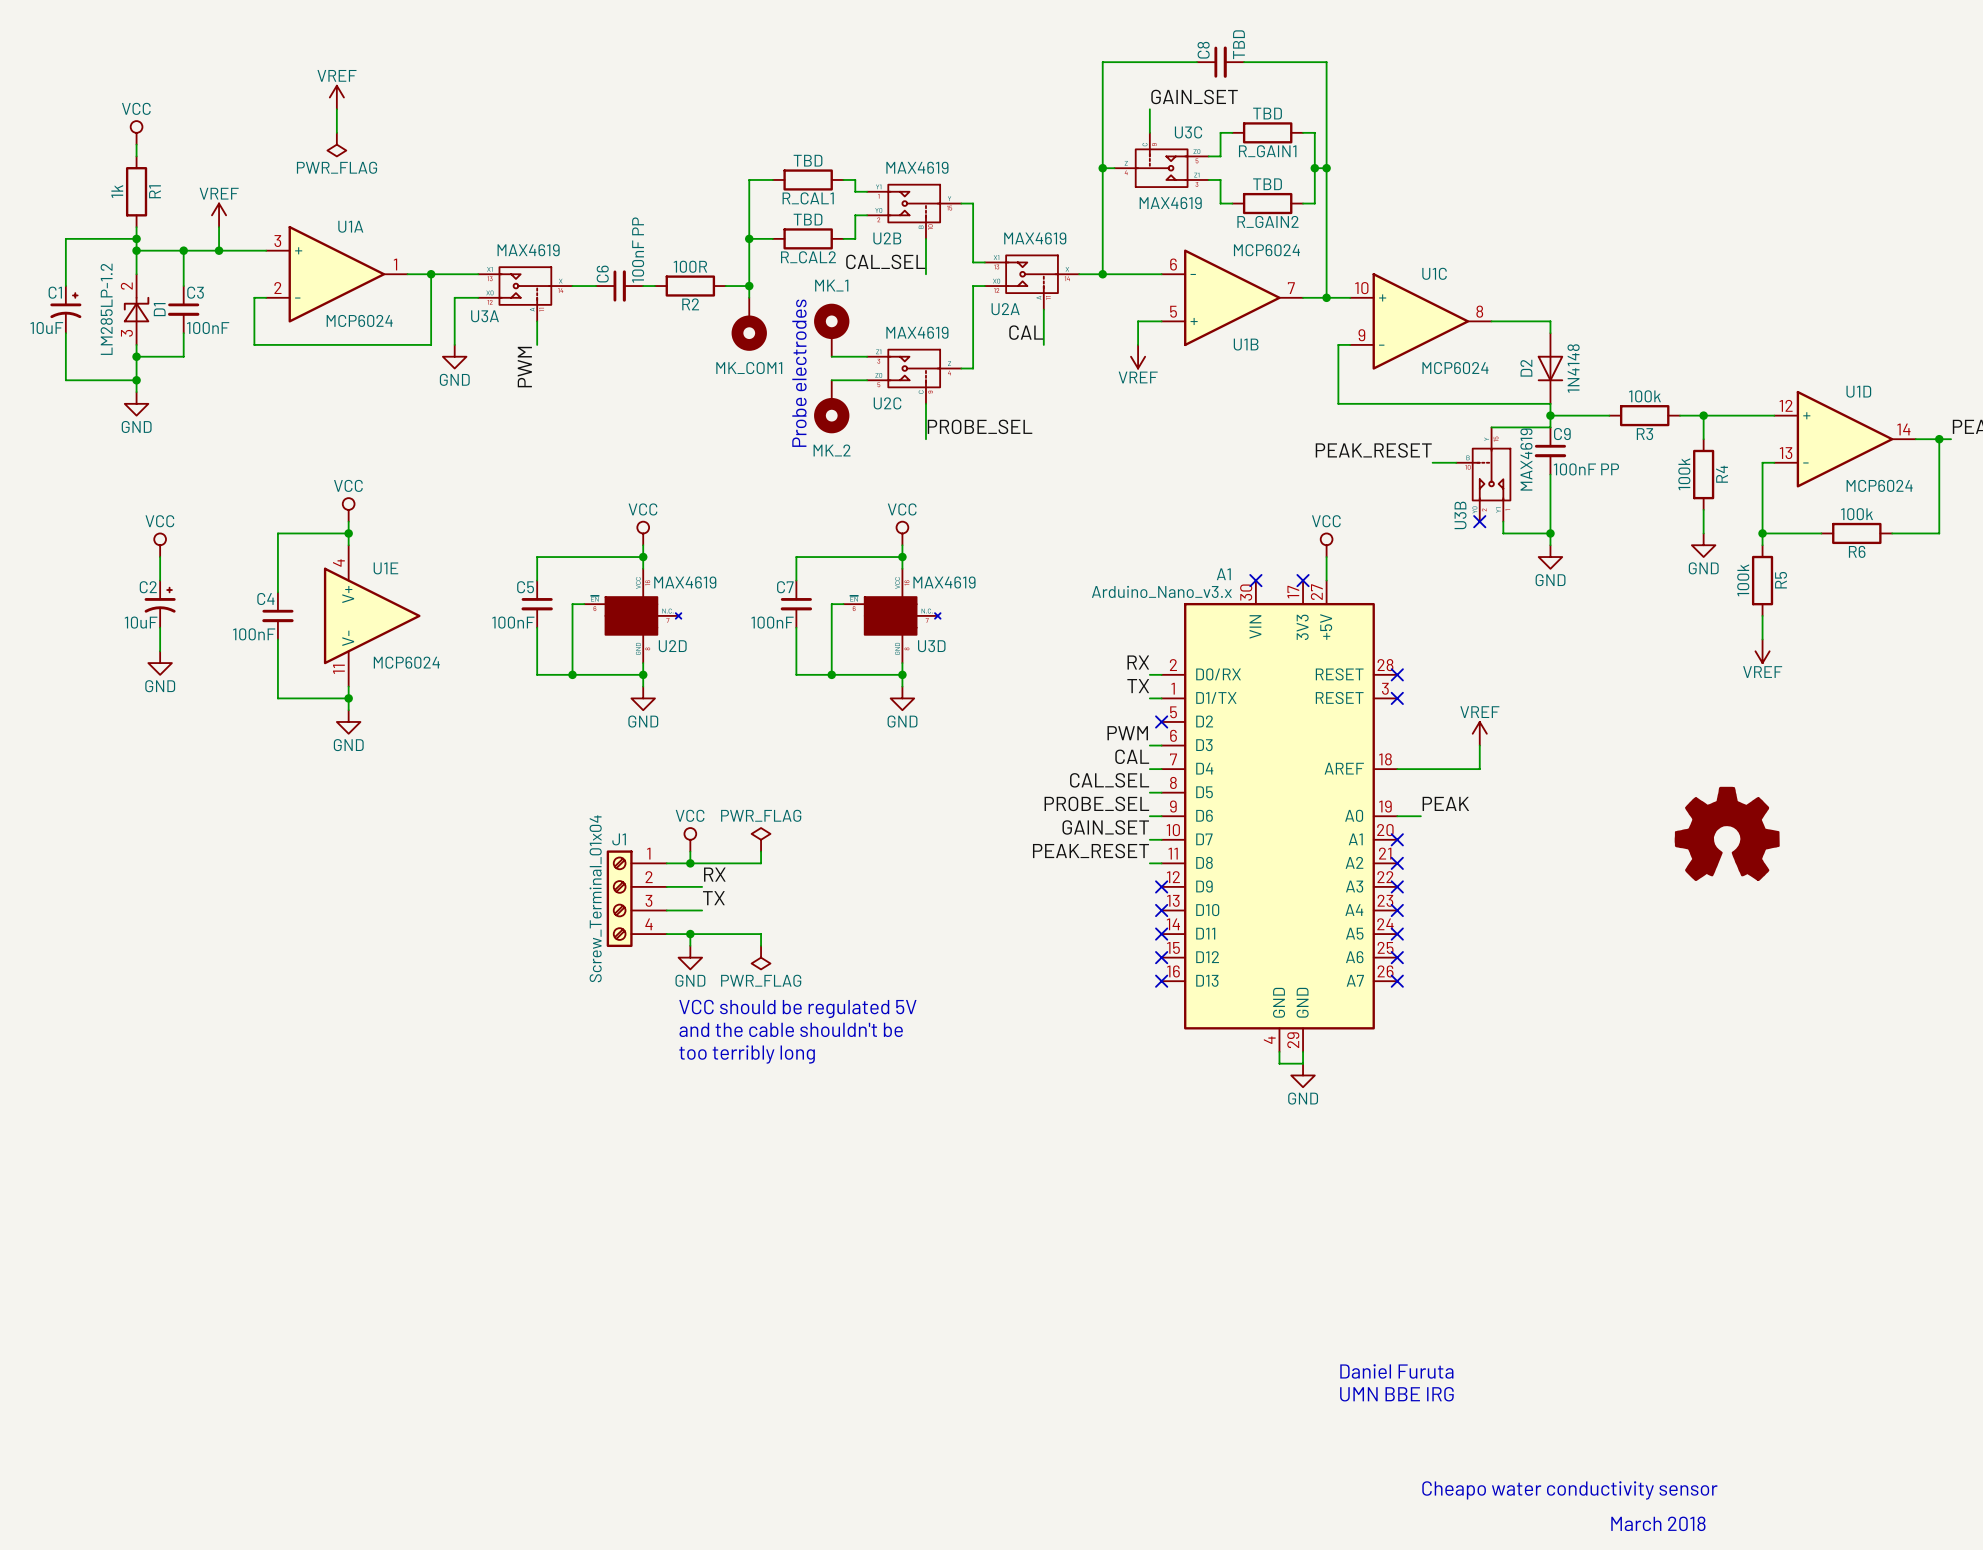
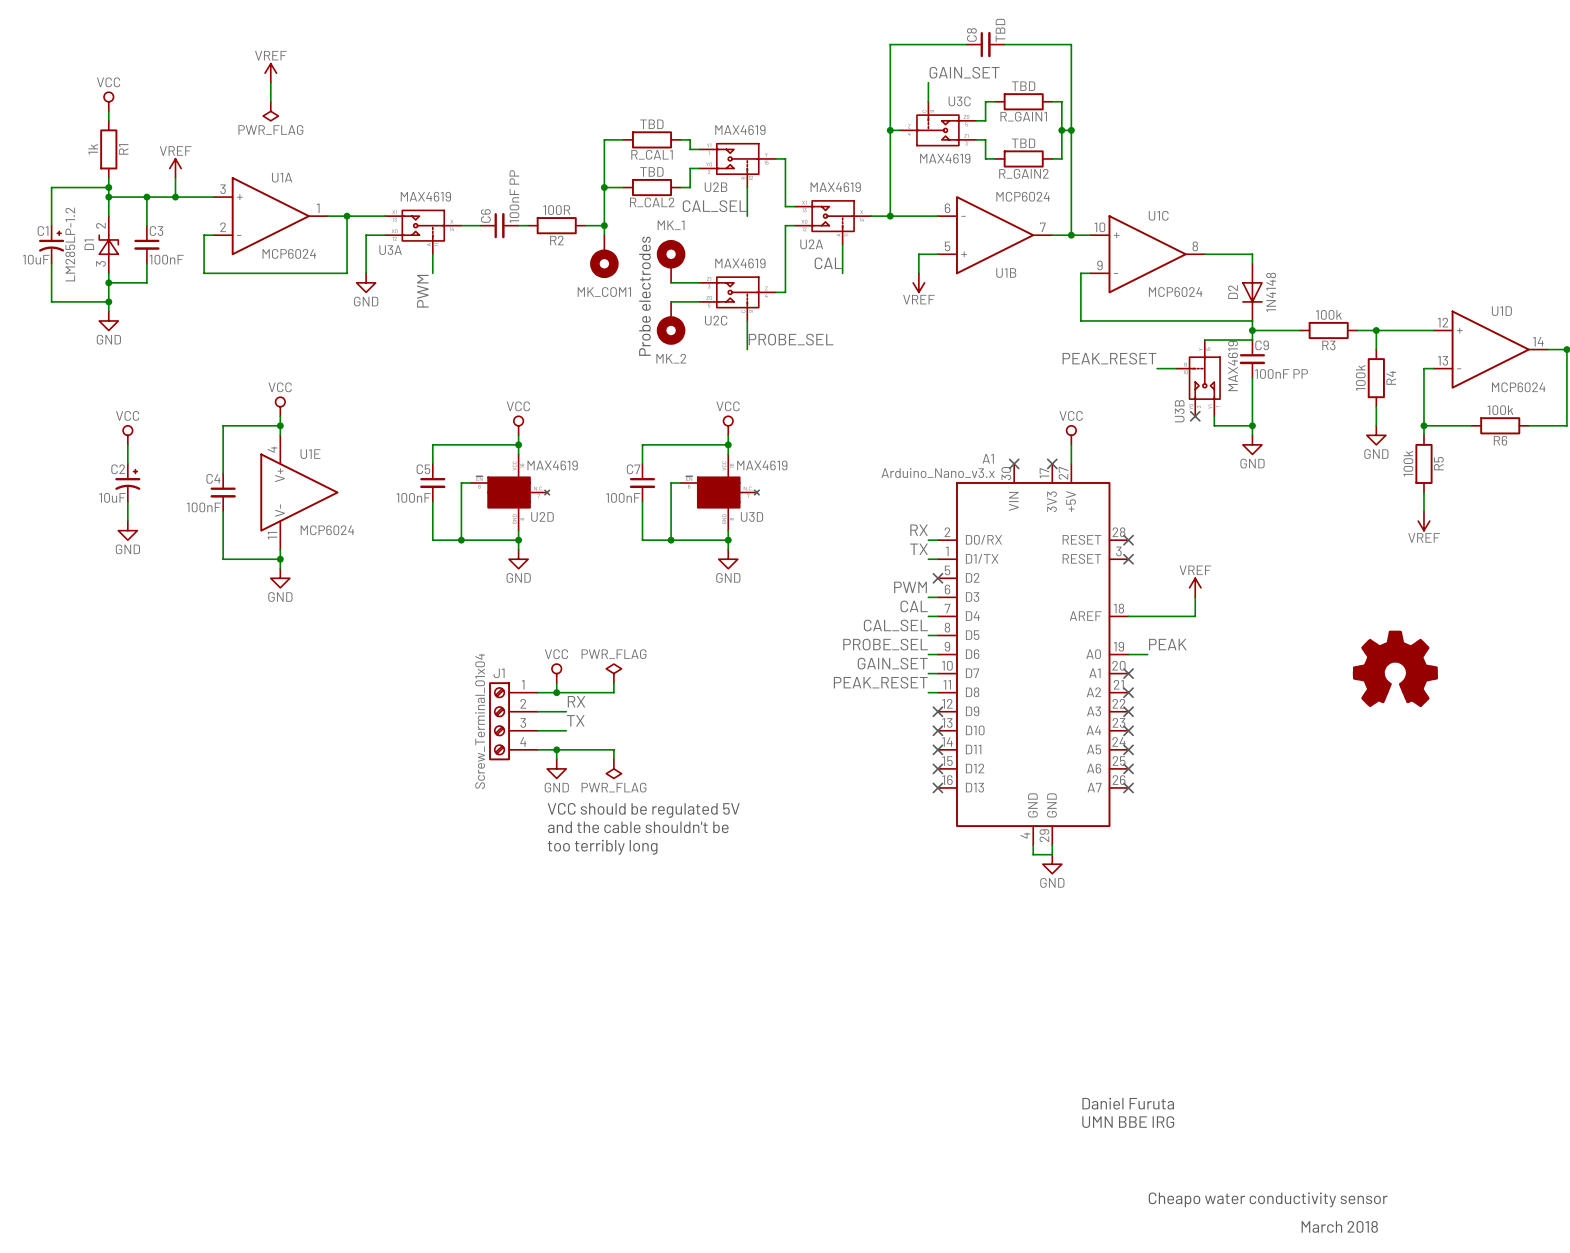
D1 flip: as is (136, 309) -> left-right (108, 244)

